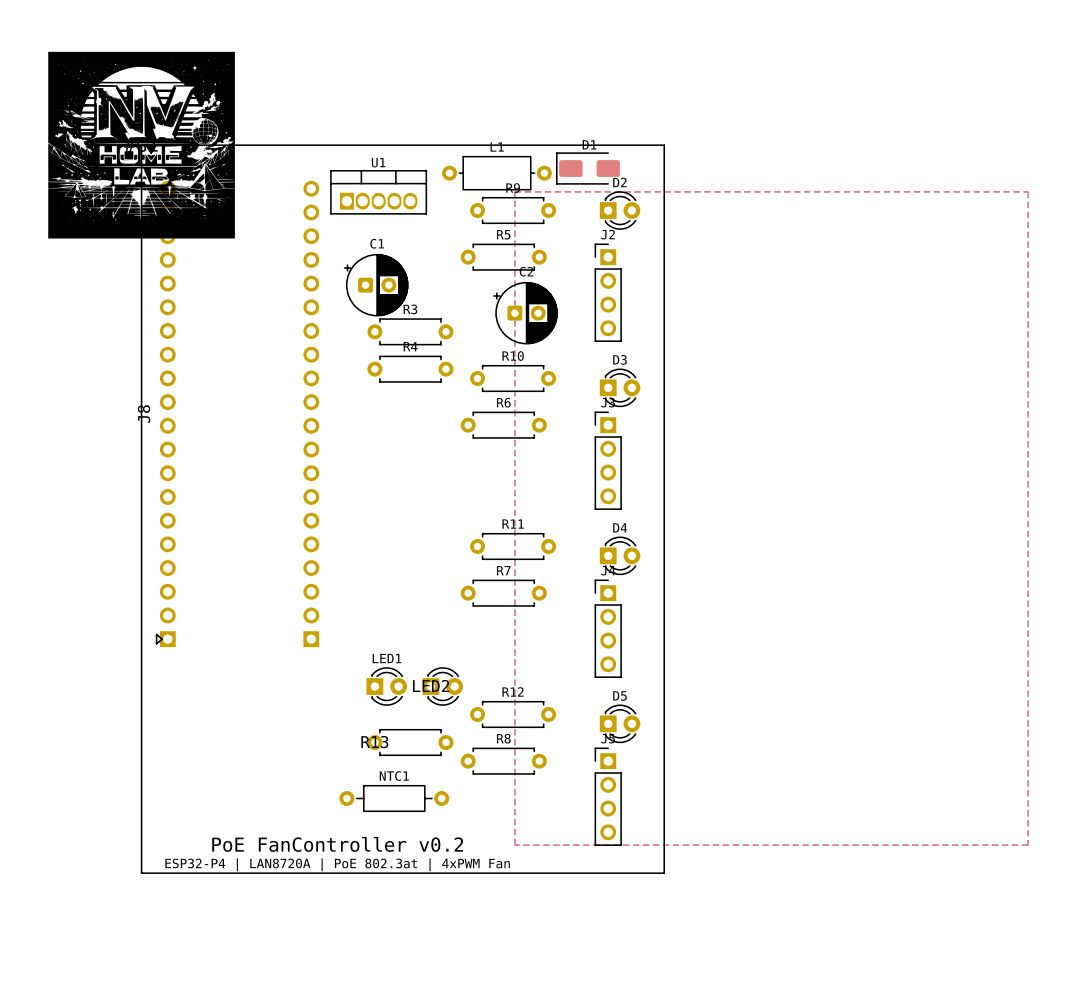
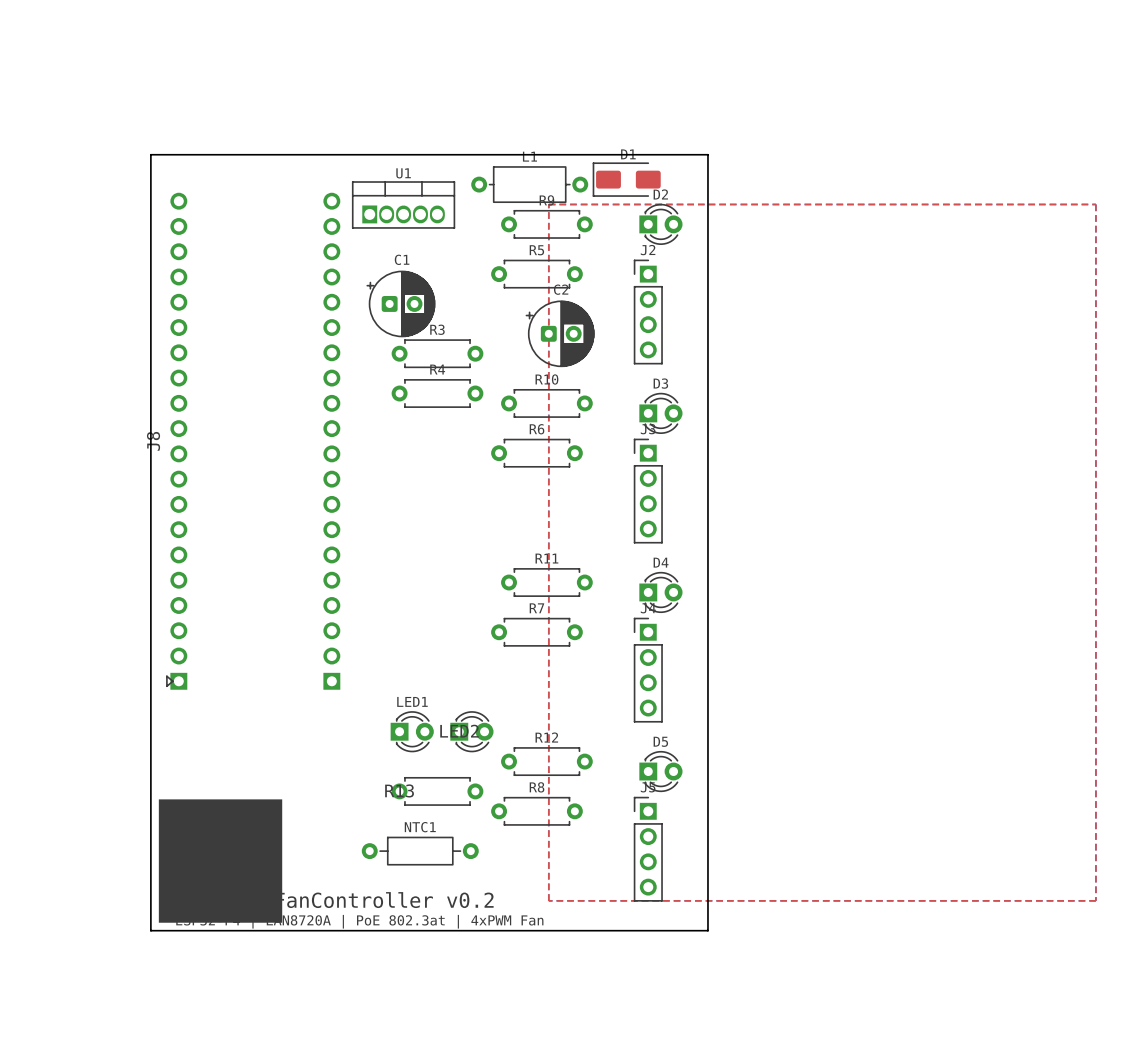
part: (141, 145) -> none
drawing: none -> [158, 799, 283, 923]

